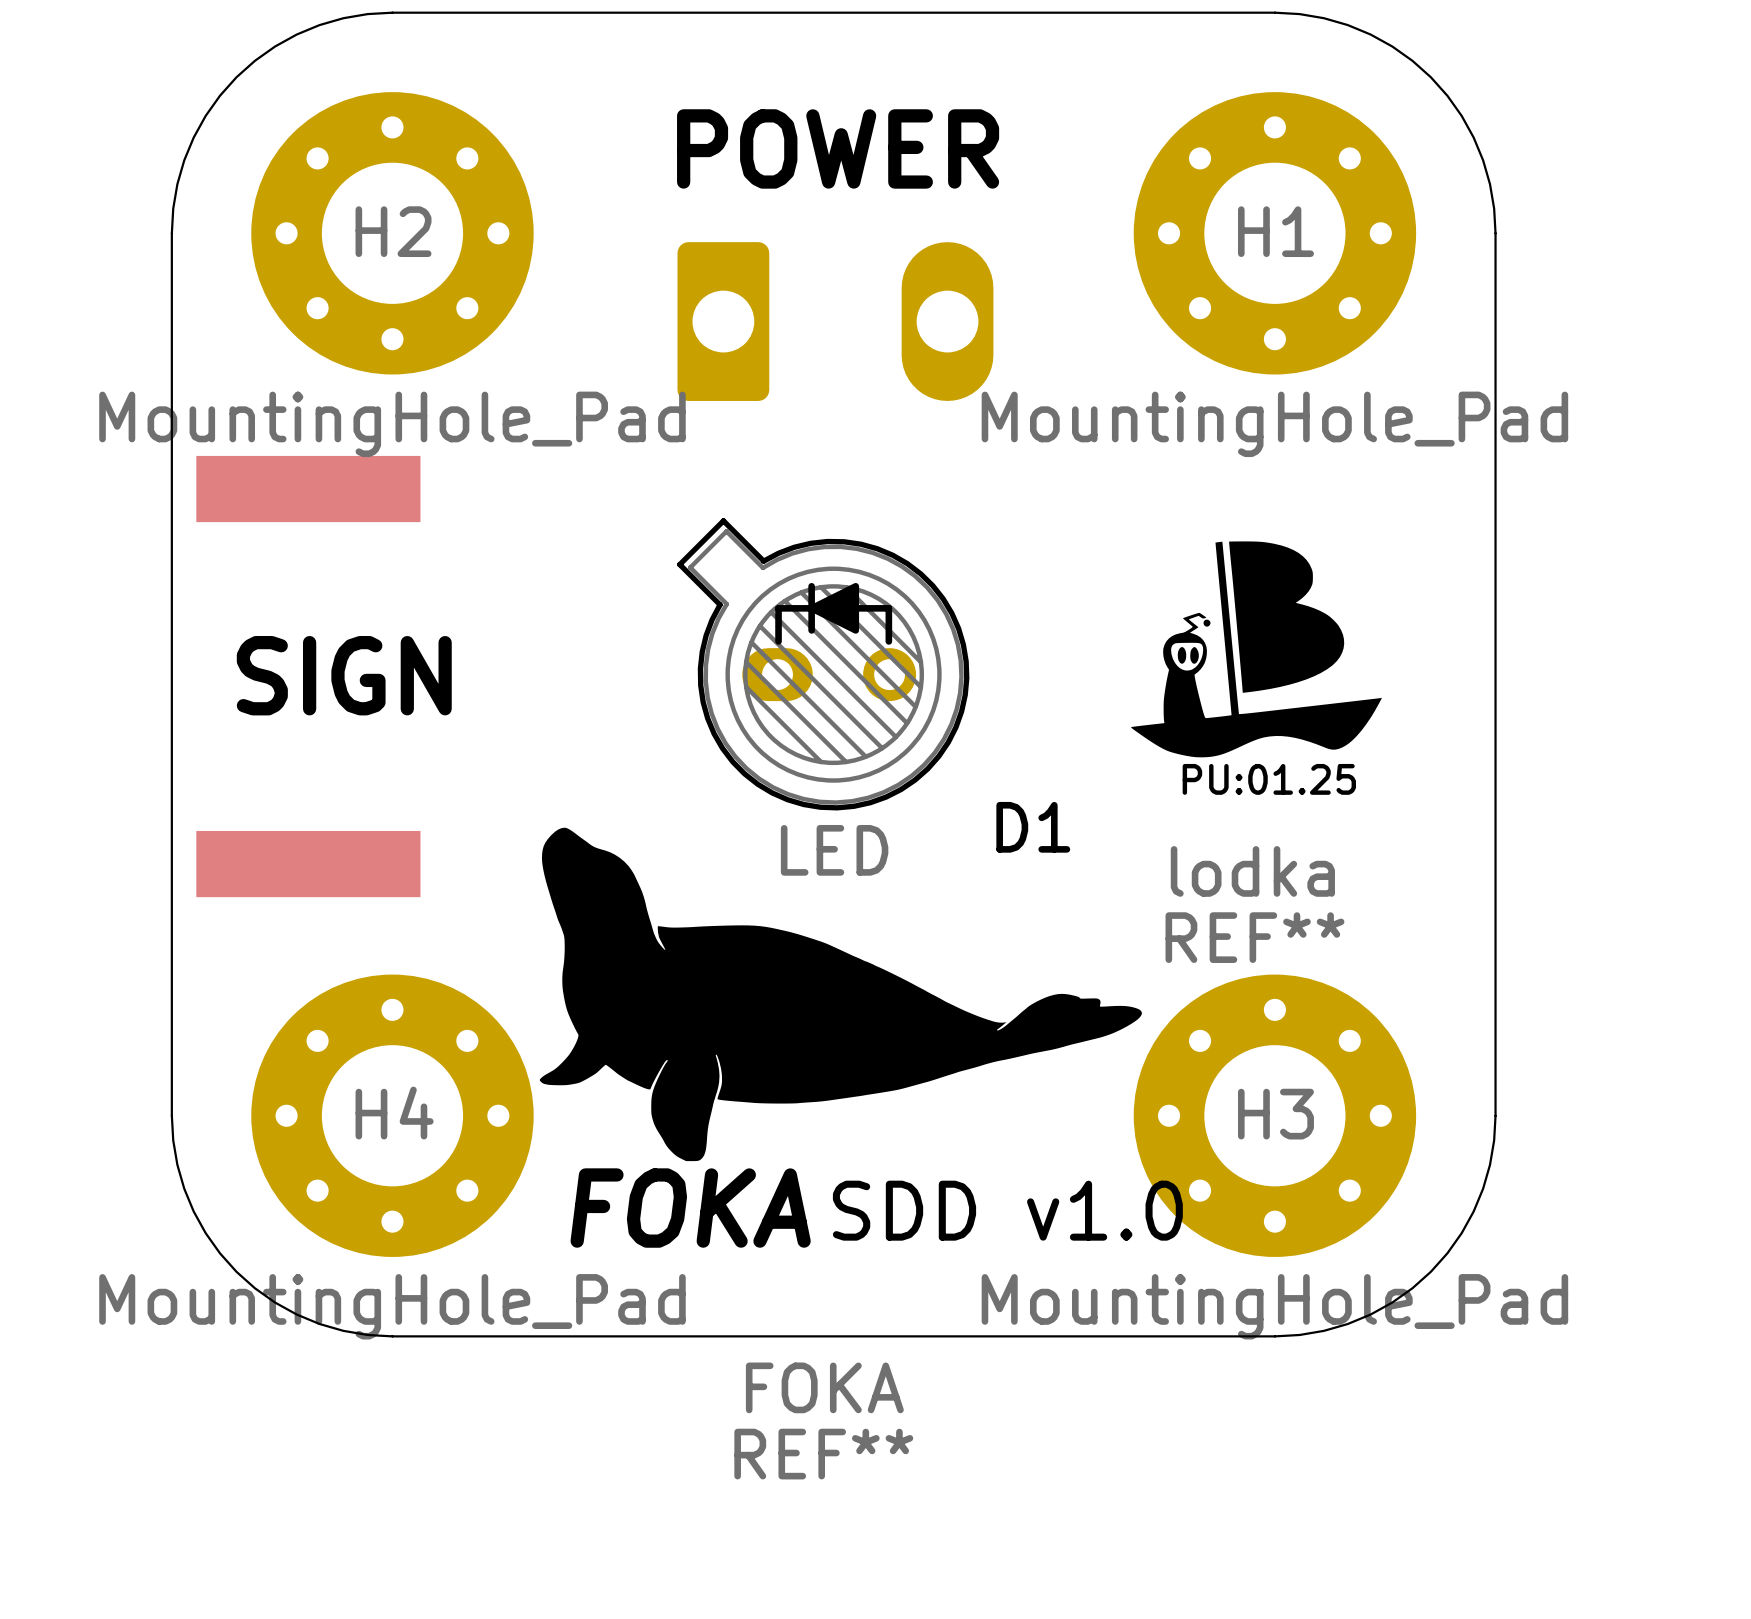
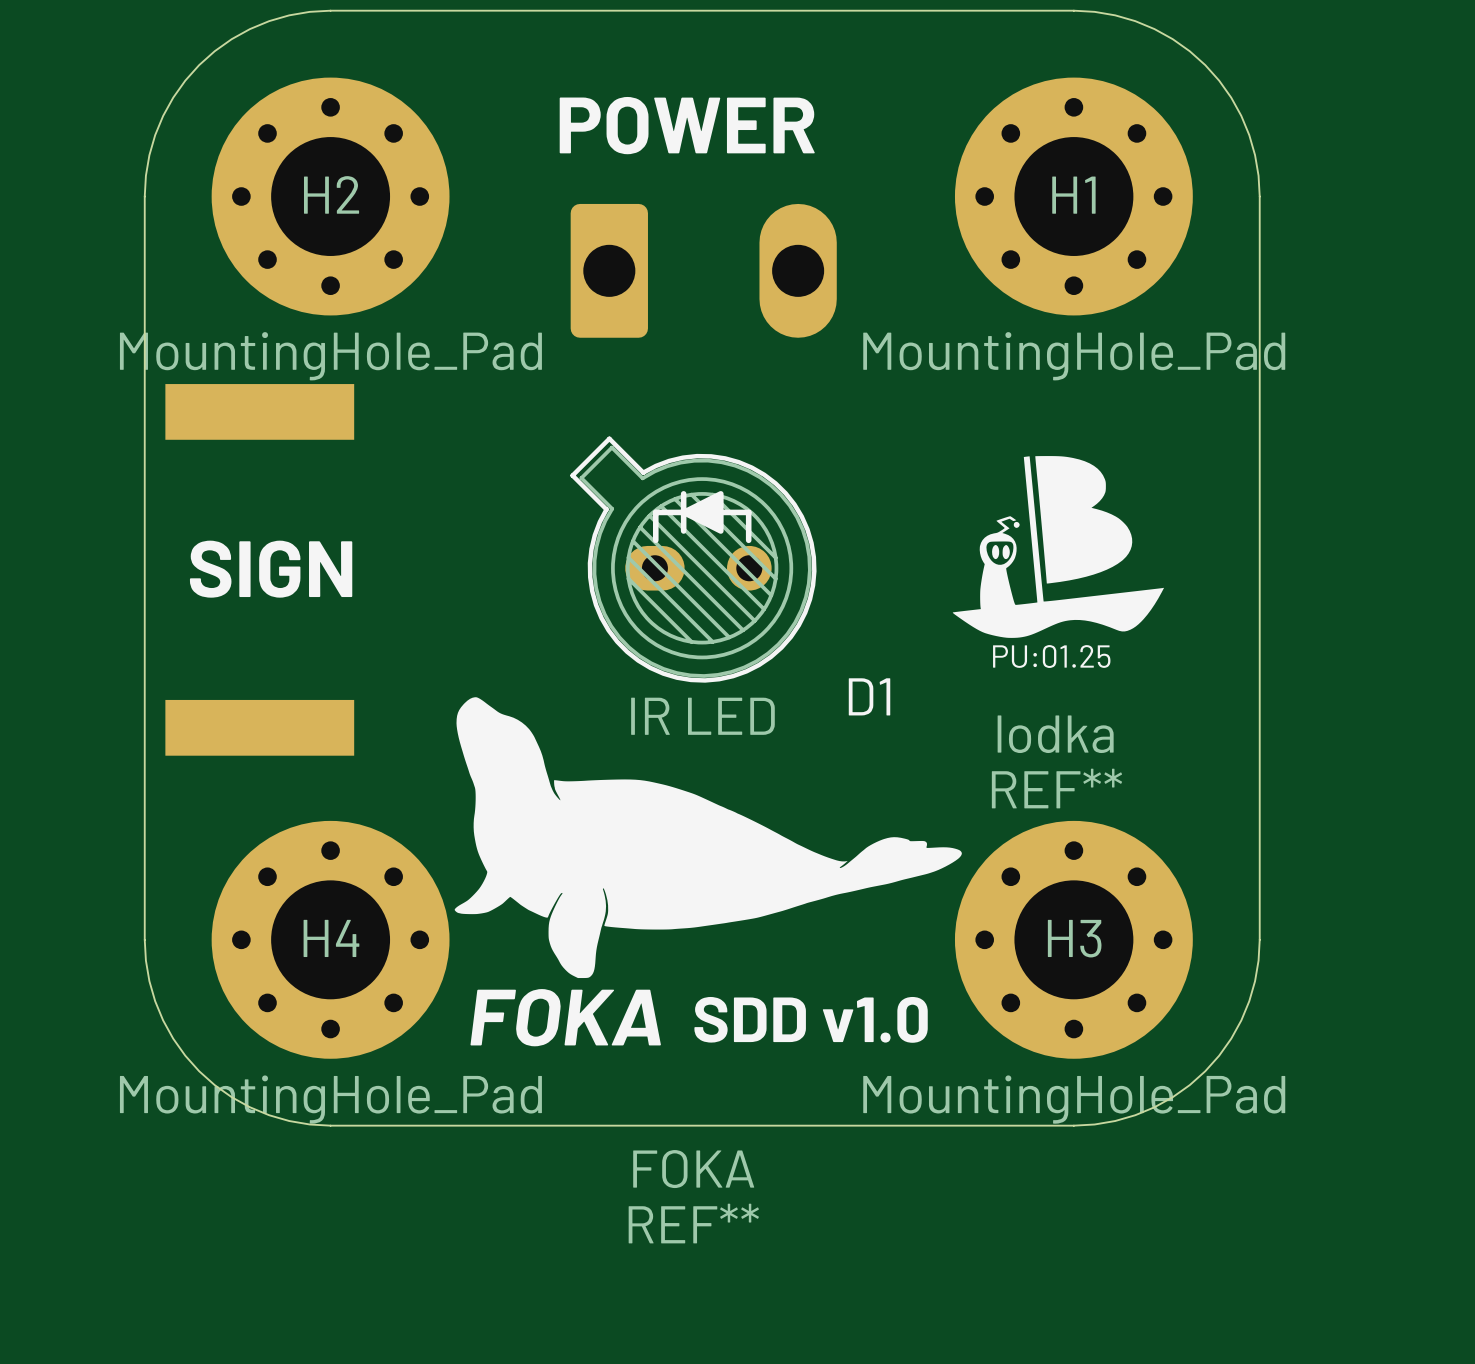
D1 value: LED (834, 850) -> IR LED (702, 716)

